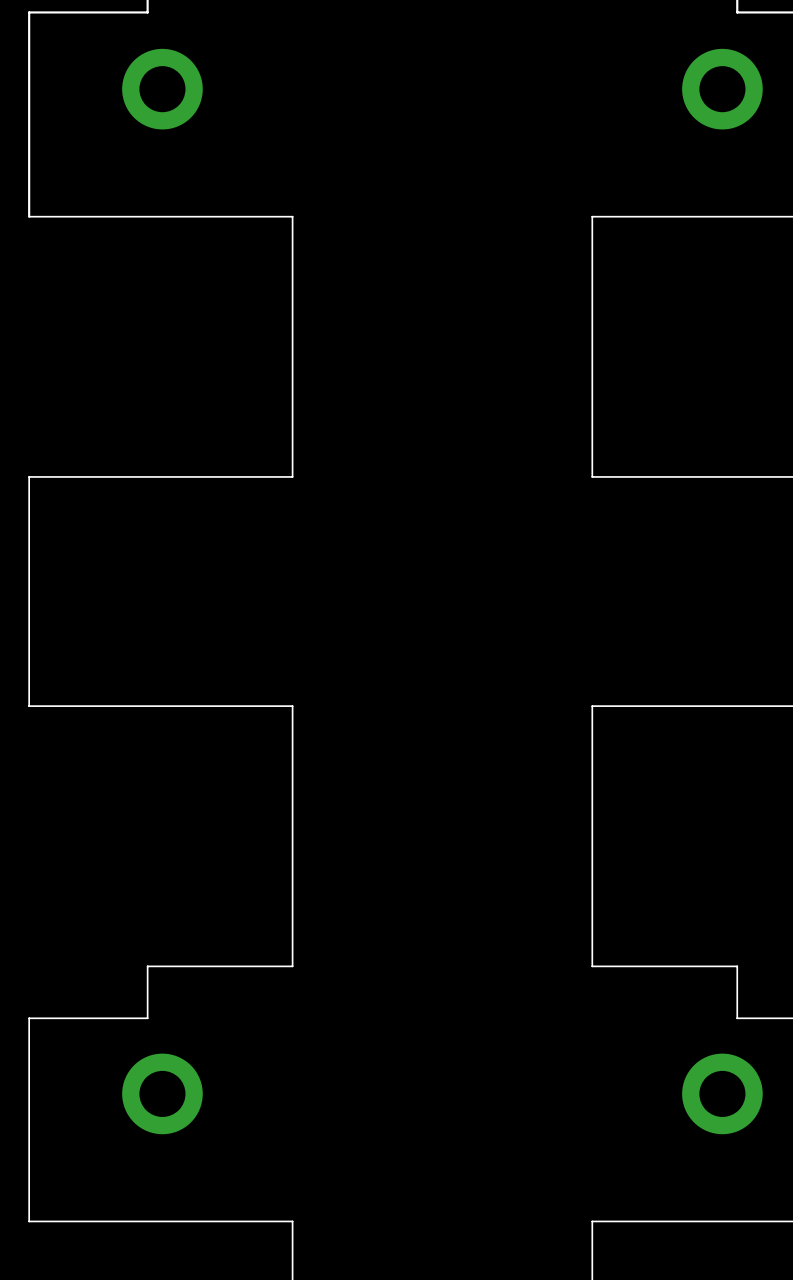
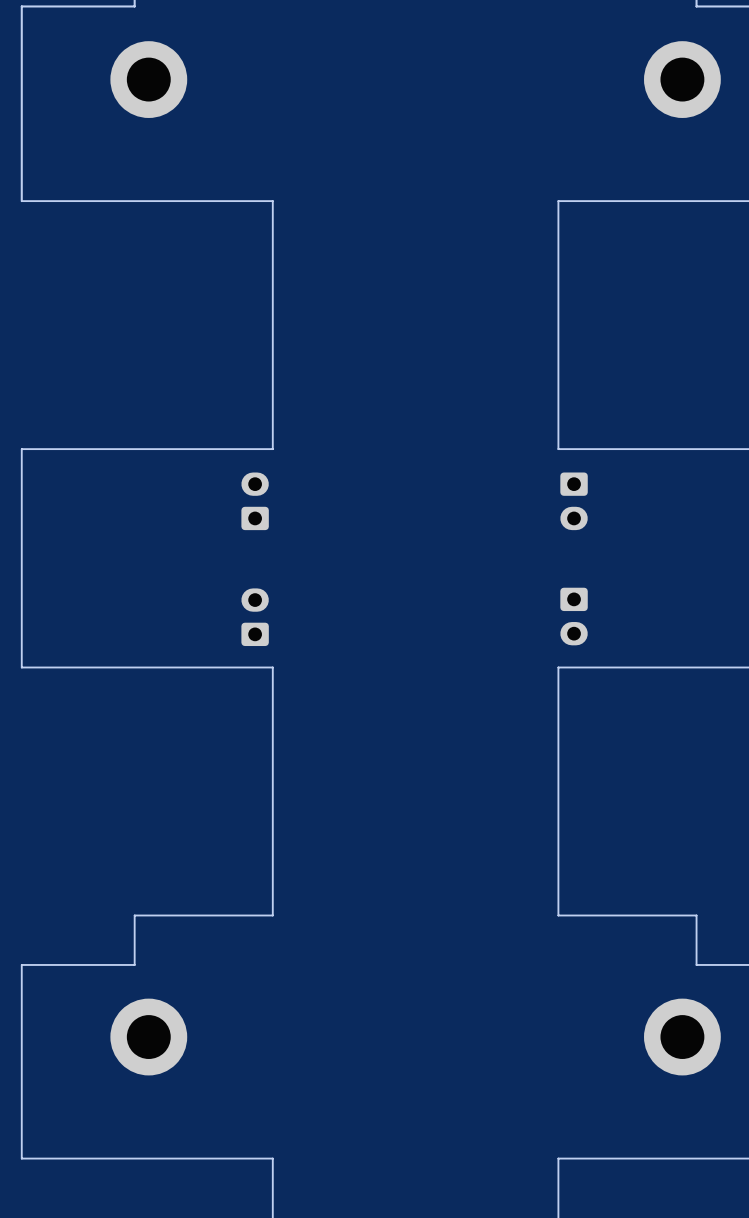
part: none -> (255, 501)
part: none -> (574, 501)
part: none -> (574, 616)
part: none -> (255, 617)

